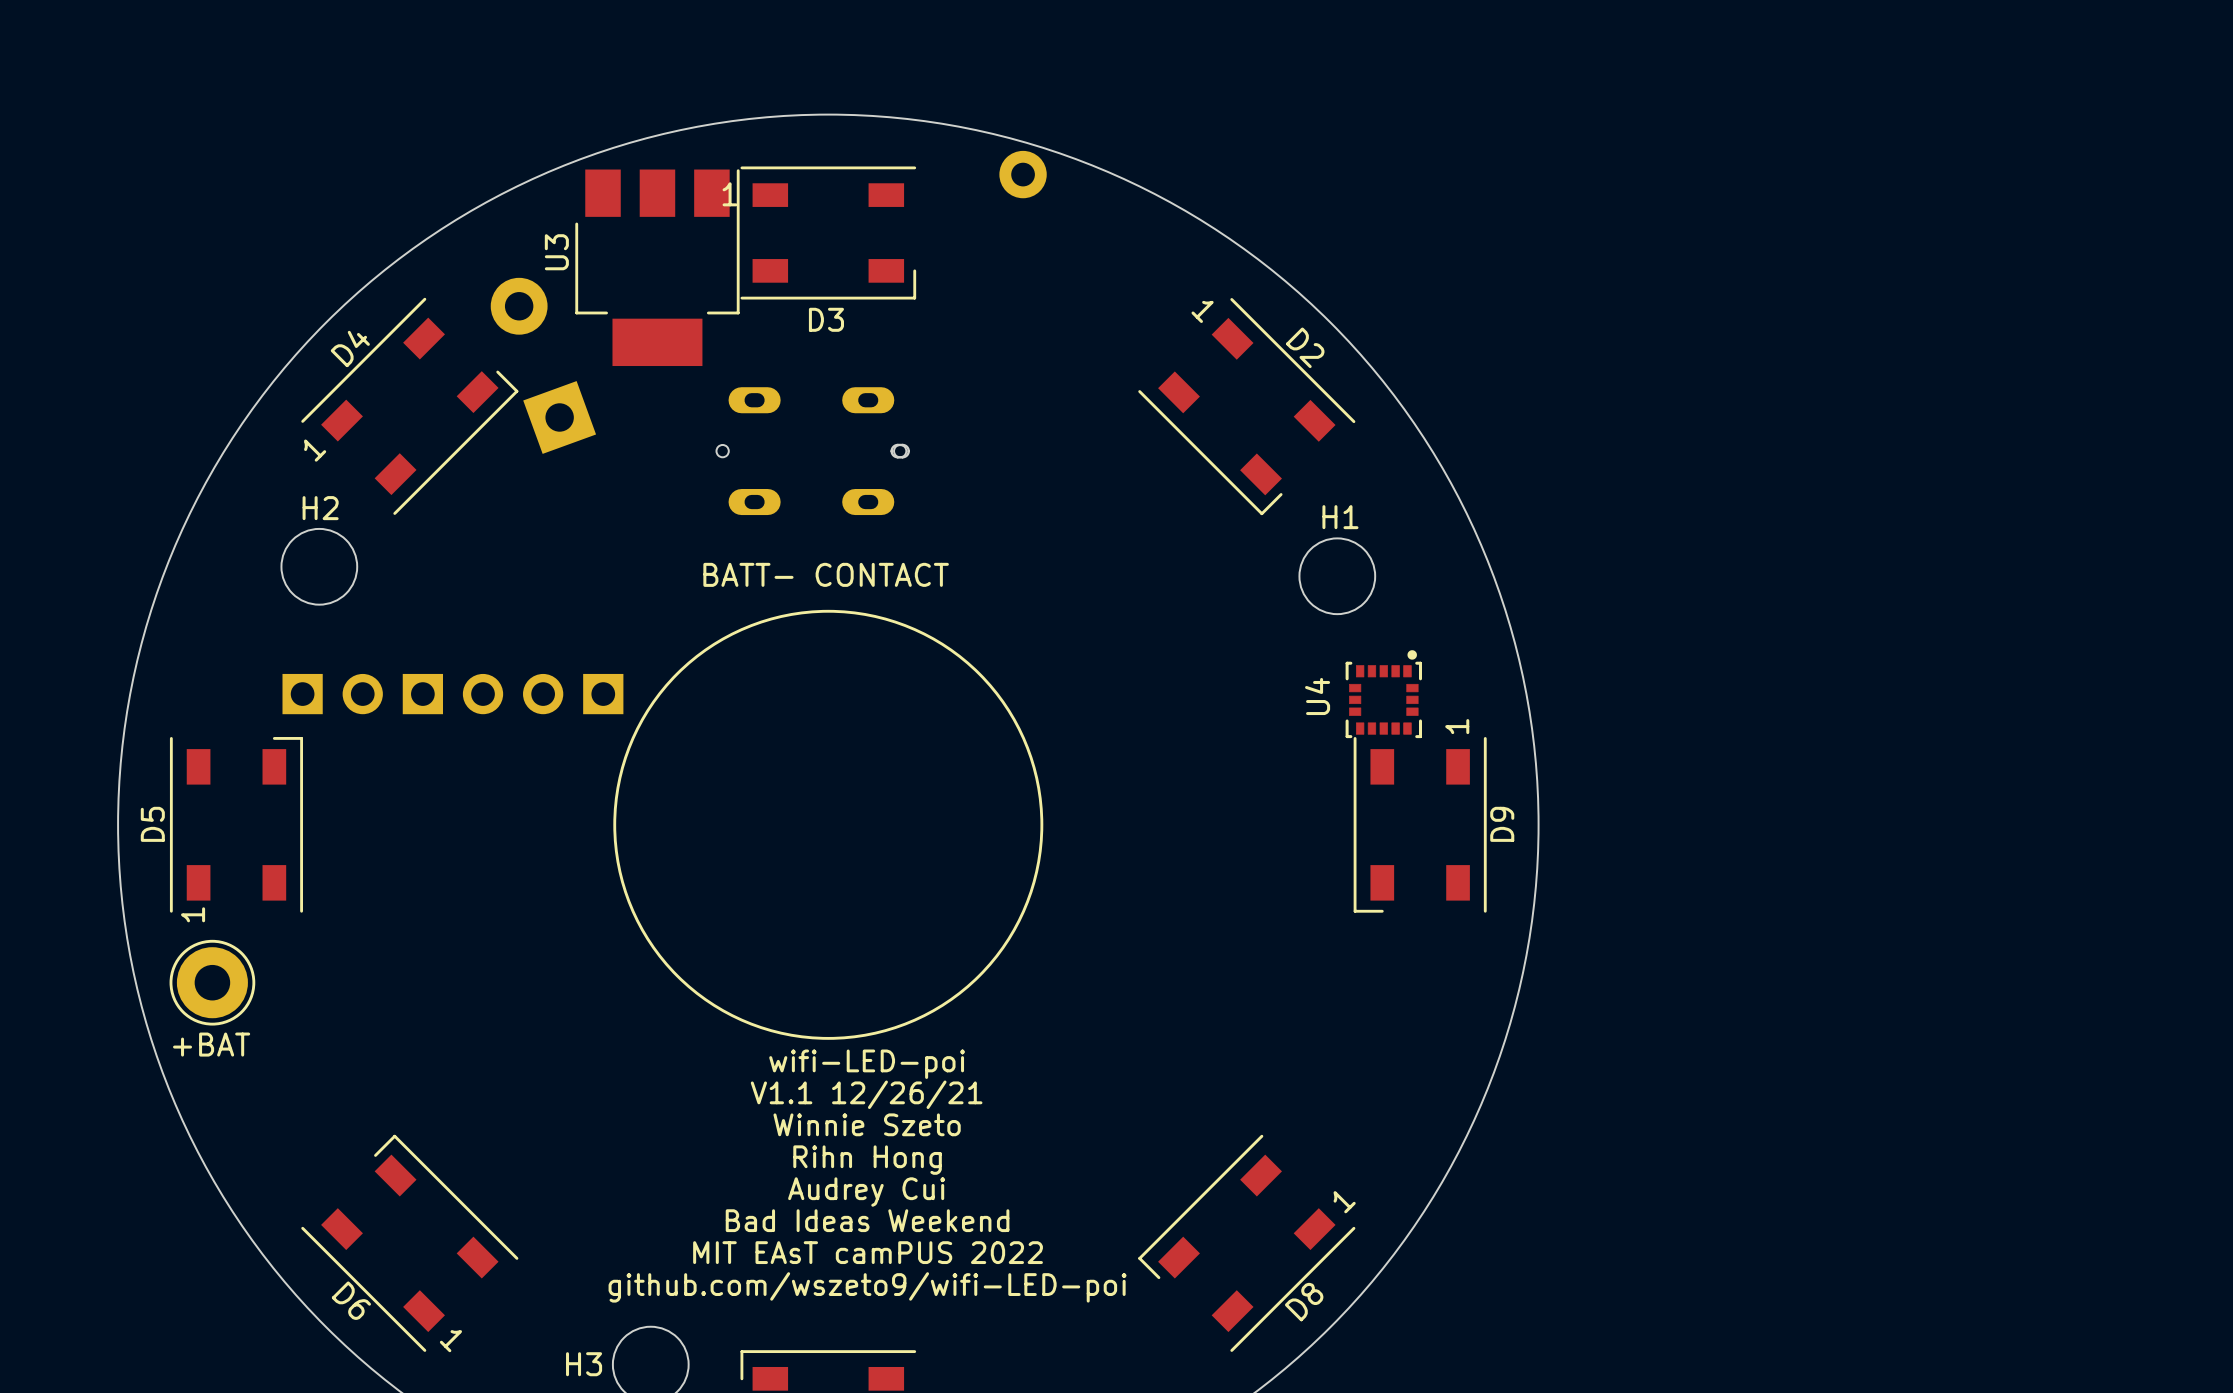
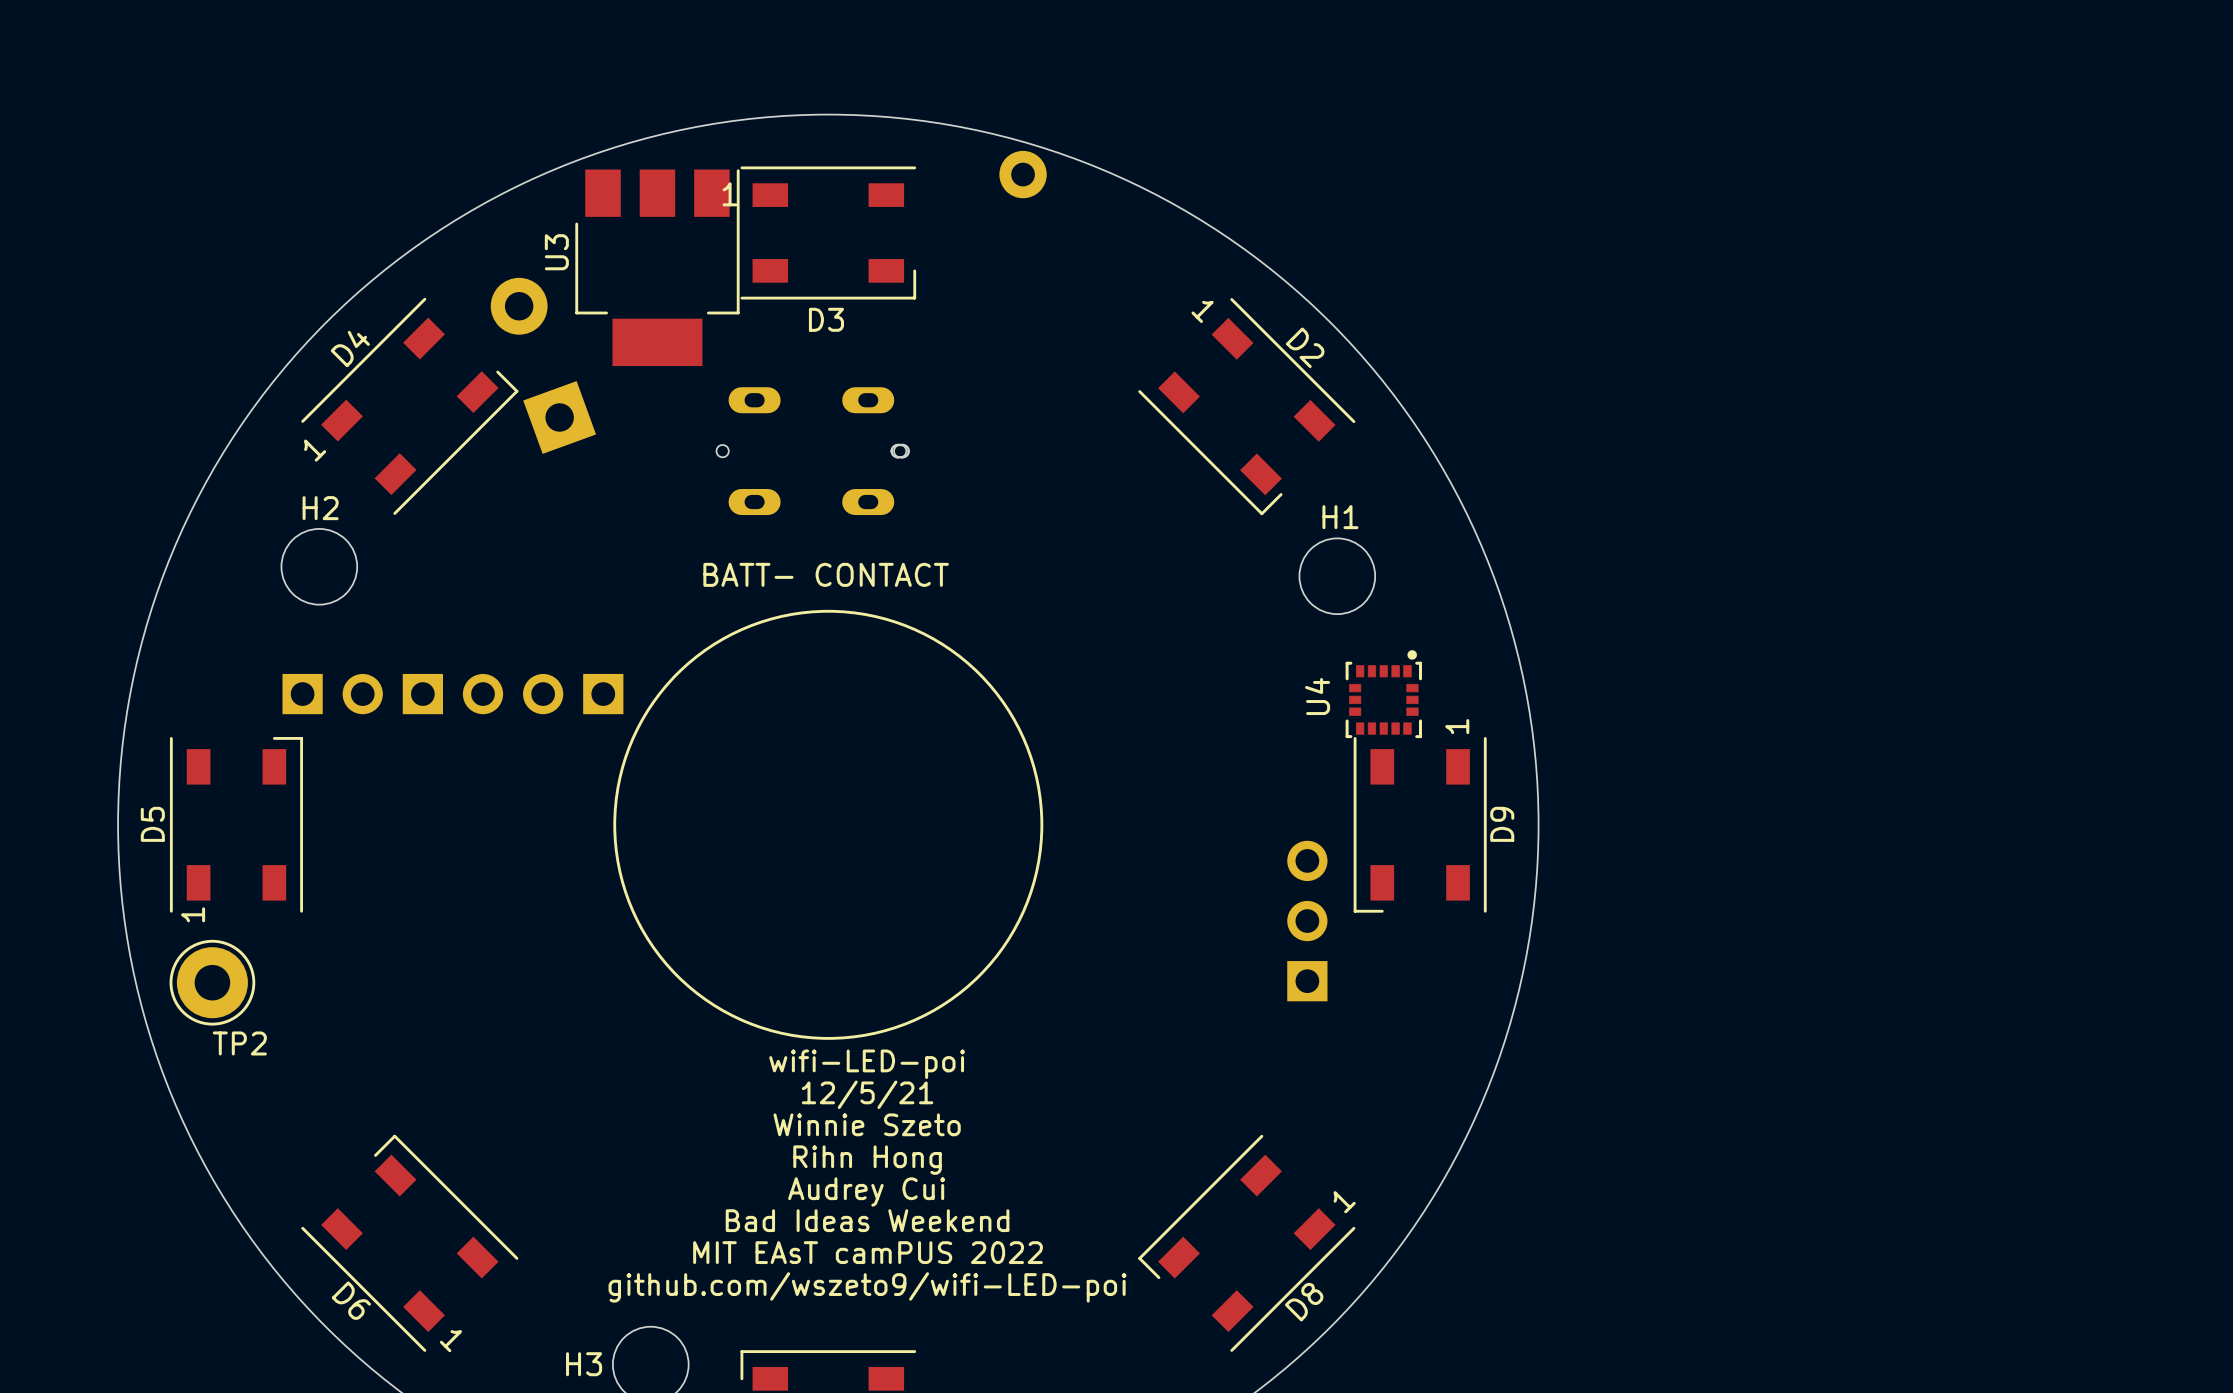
part: none -> (1307, 921)
+BAT name: +BAT (211, 1044) -> TP2 (239, 1043)
text: V1.1 12/26/21 (866, 1094) -> 12/5/21 (867, 1094)

